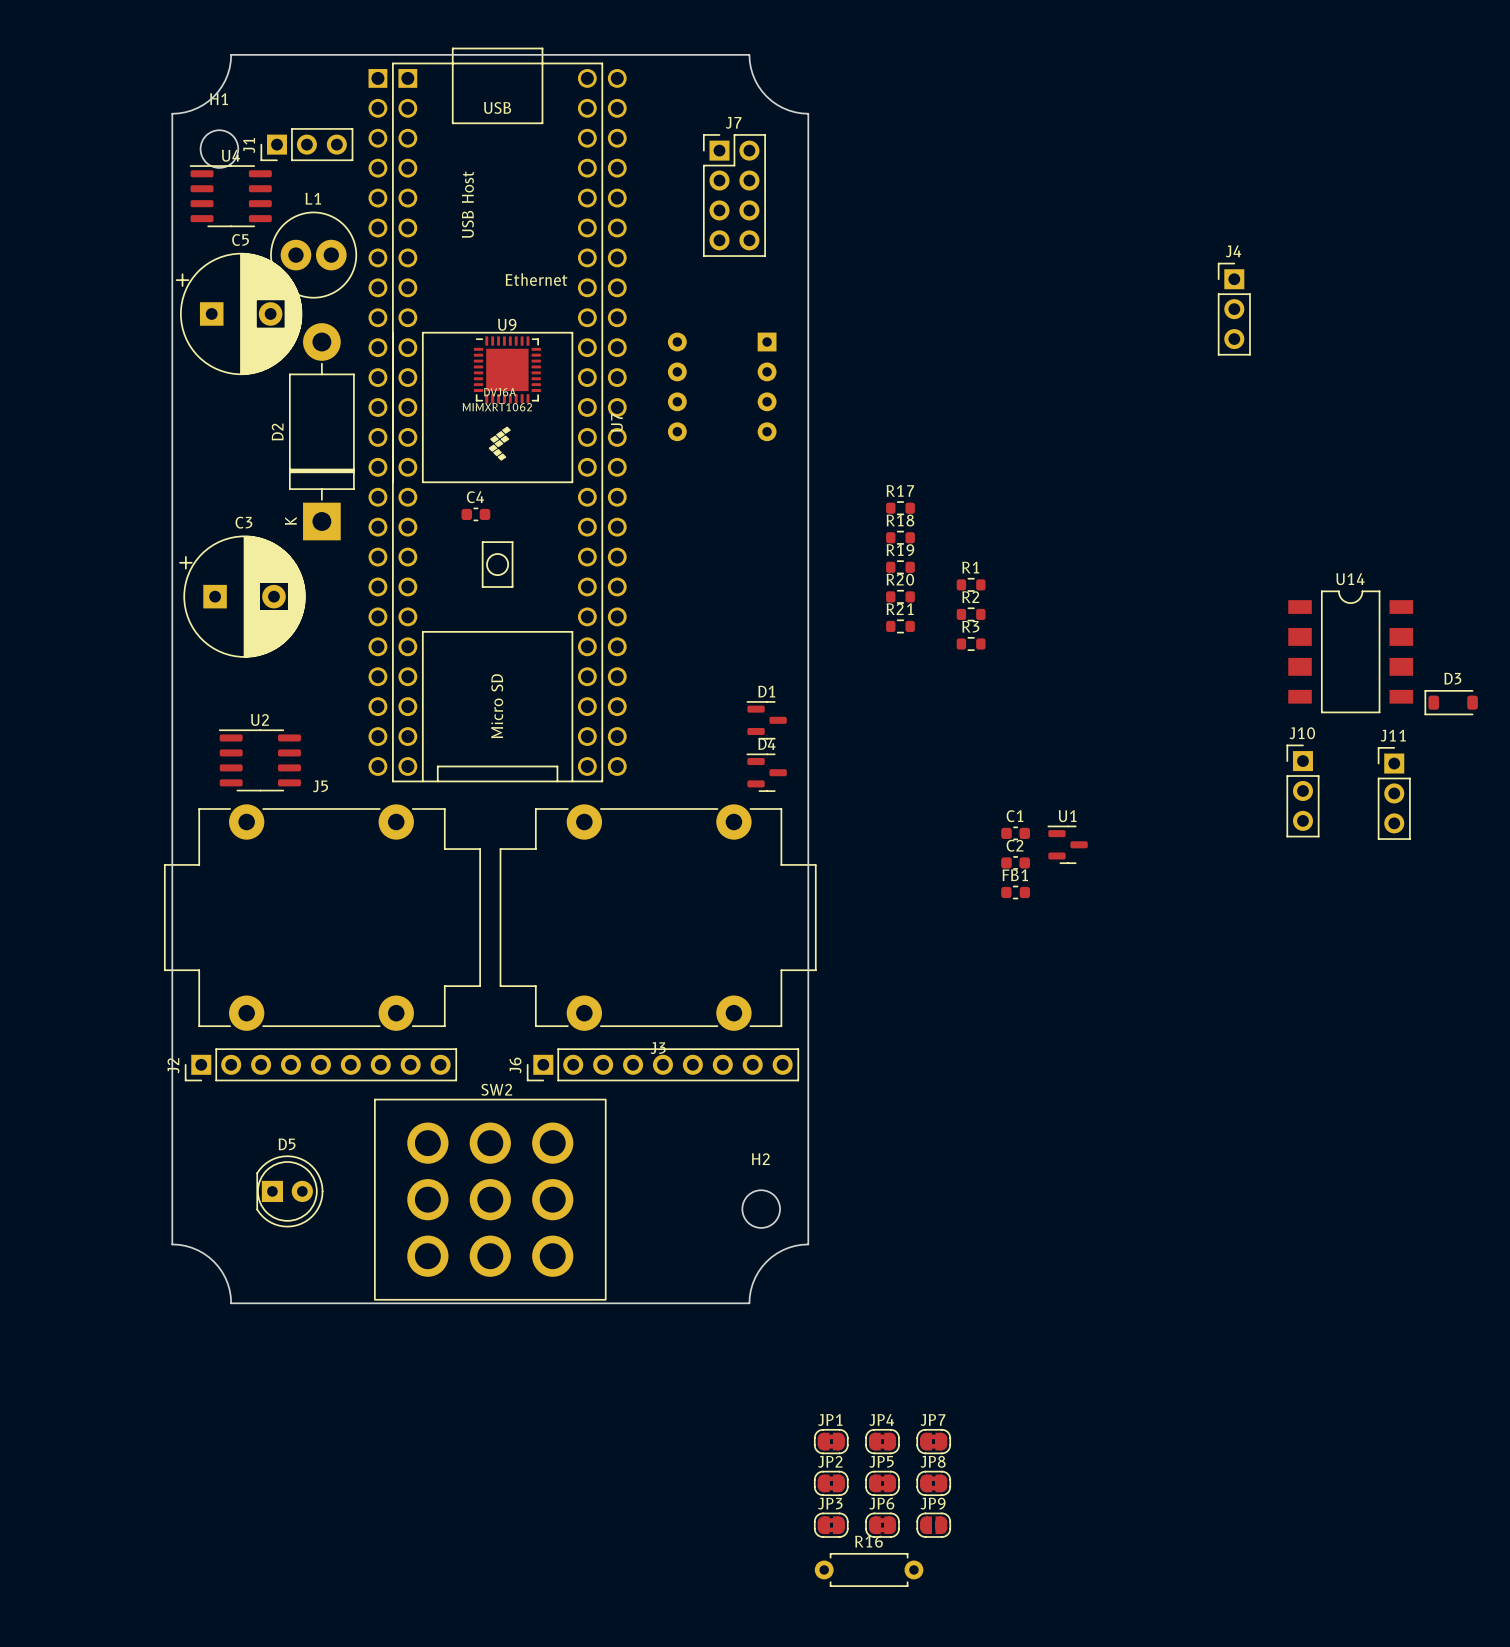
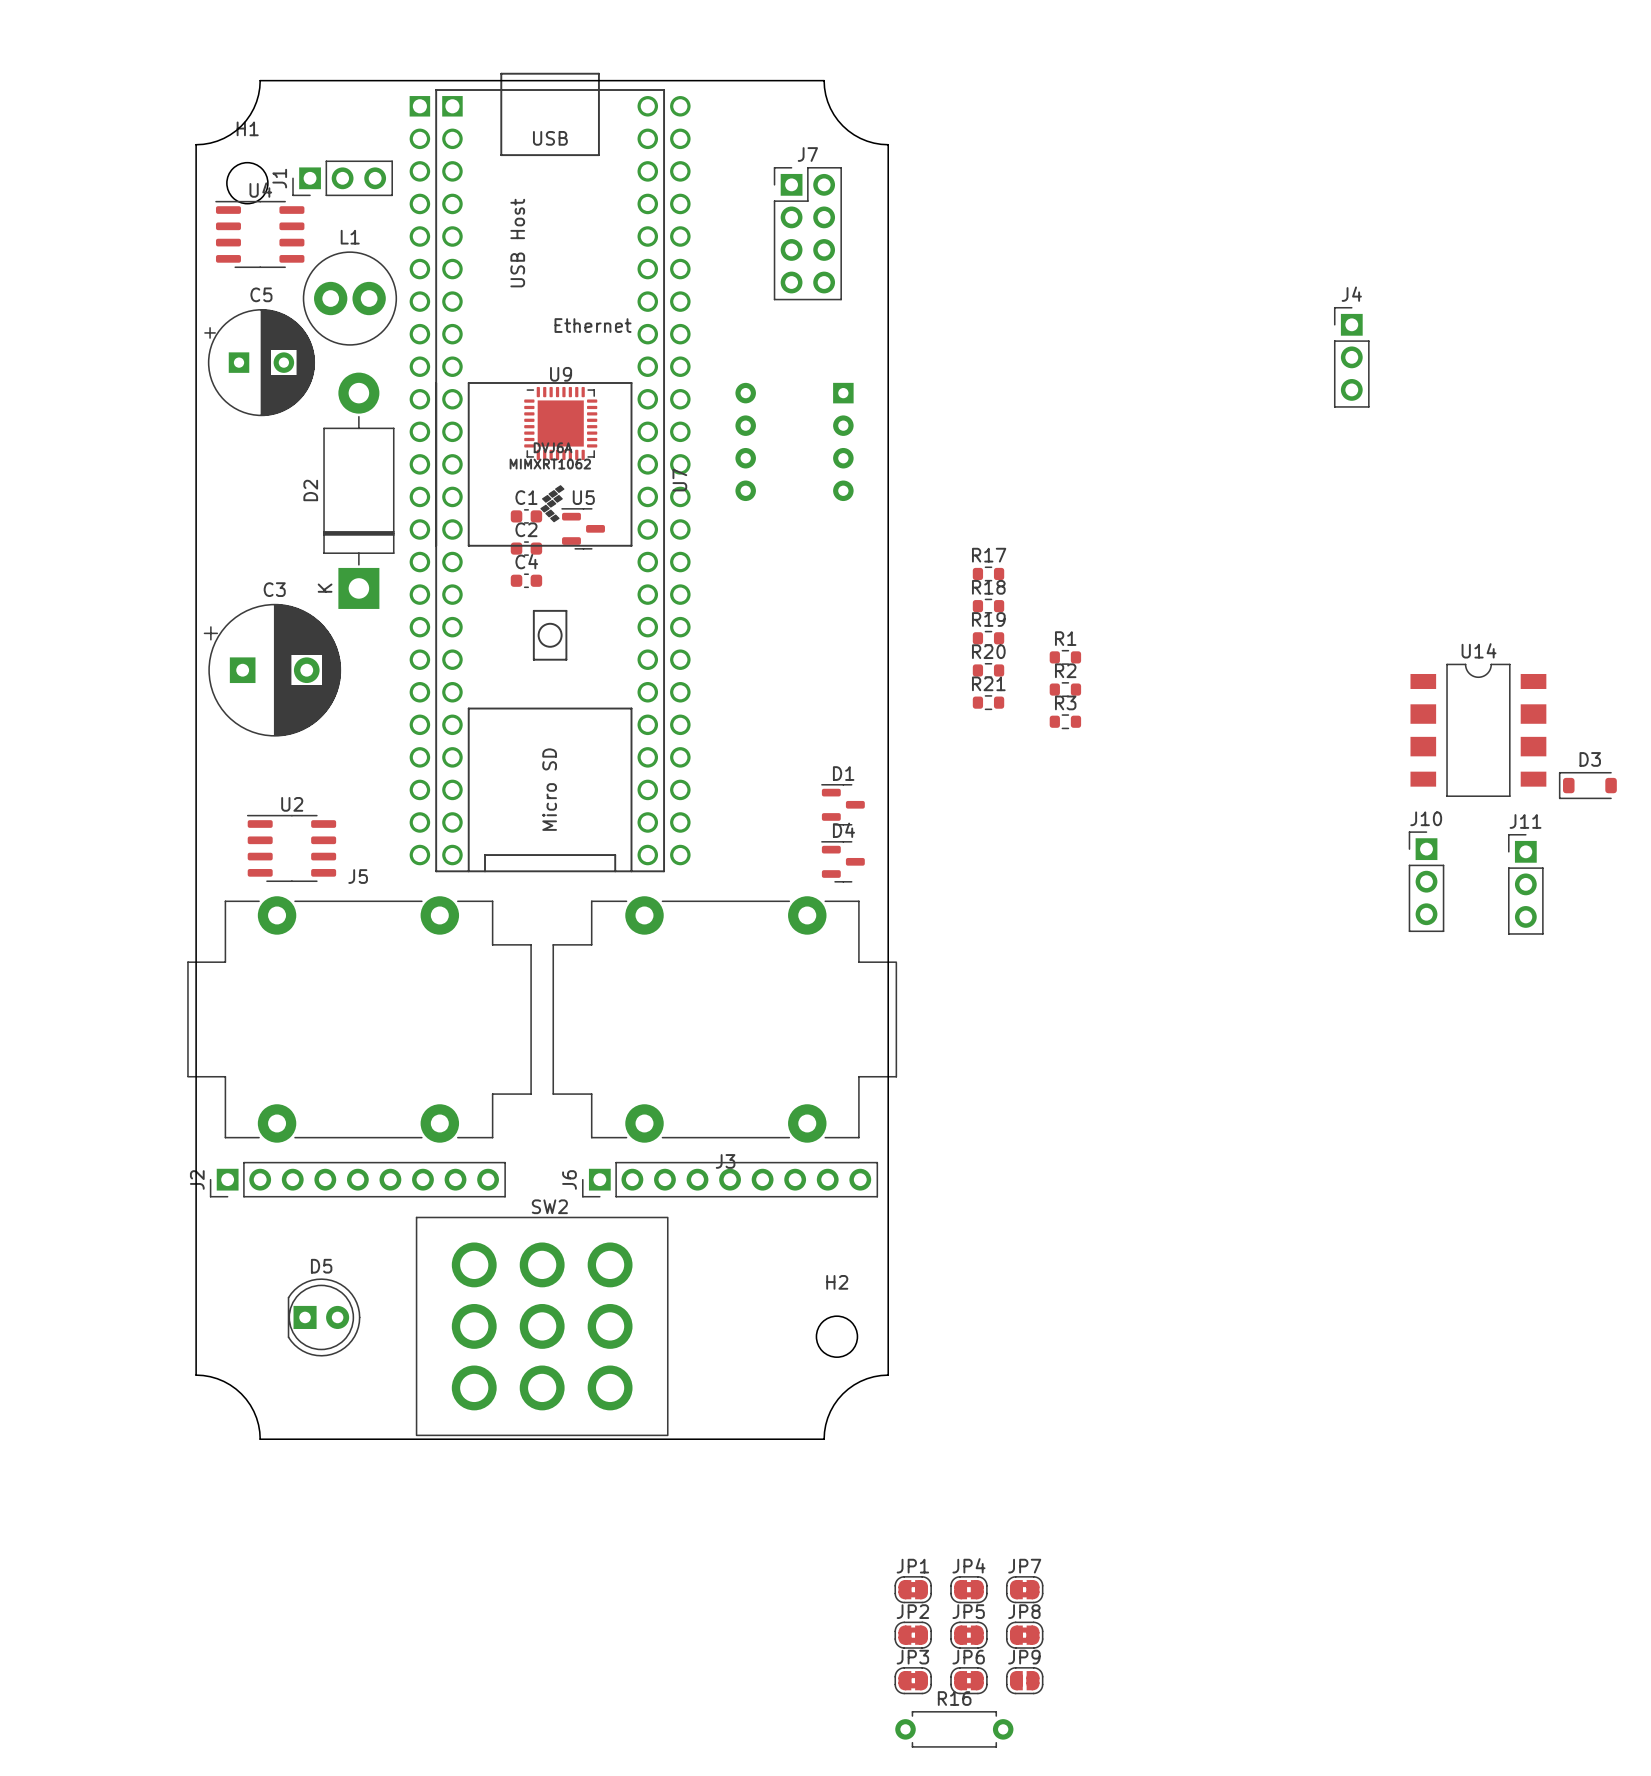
C5 footprint: [175, 252, 303, 375] -> [204, 309, 316, 417]
U5: none -> (583, 528)
C1 position: (1015, 833) -> (526, 516)
U1: (1067, 844) -> none
C2 position: (1015, 862) -> (526, 548)
FB1: (1015, 892) -> none

